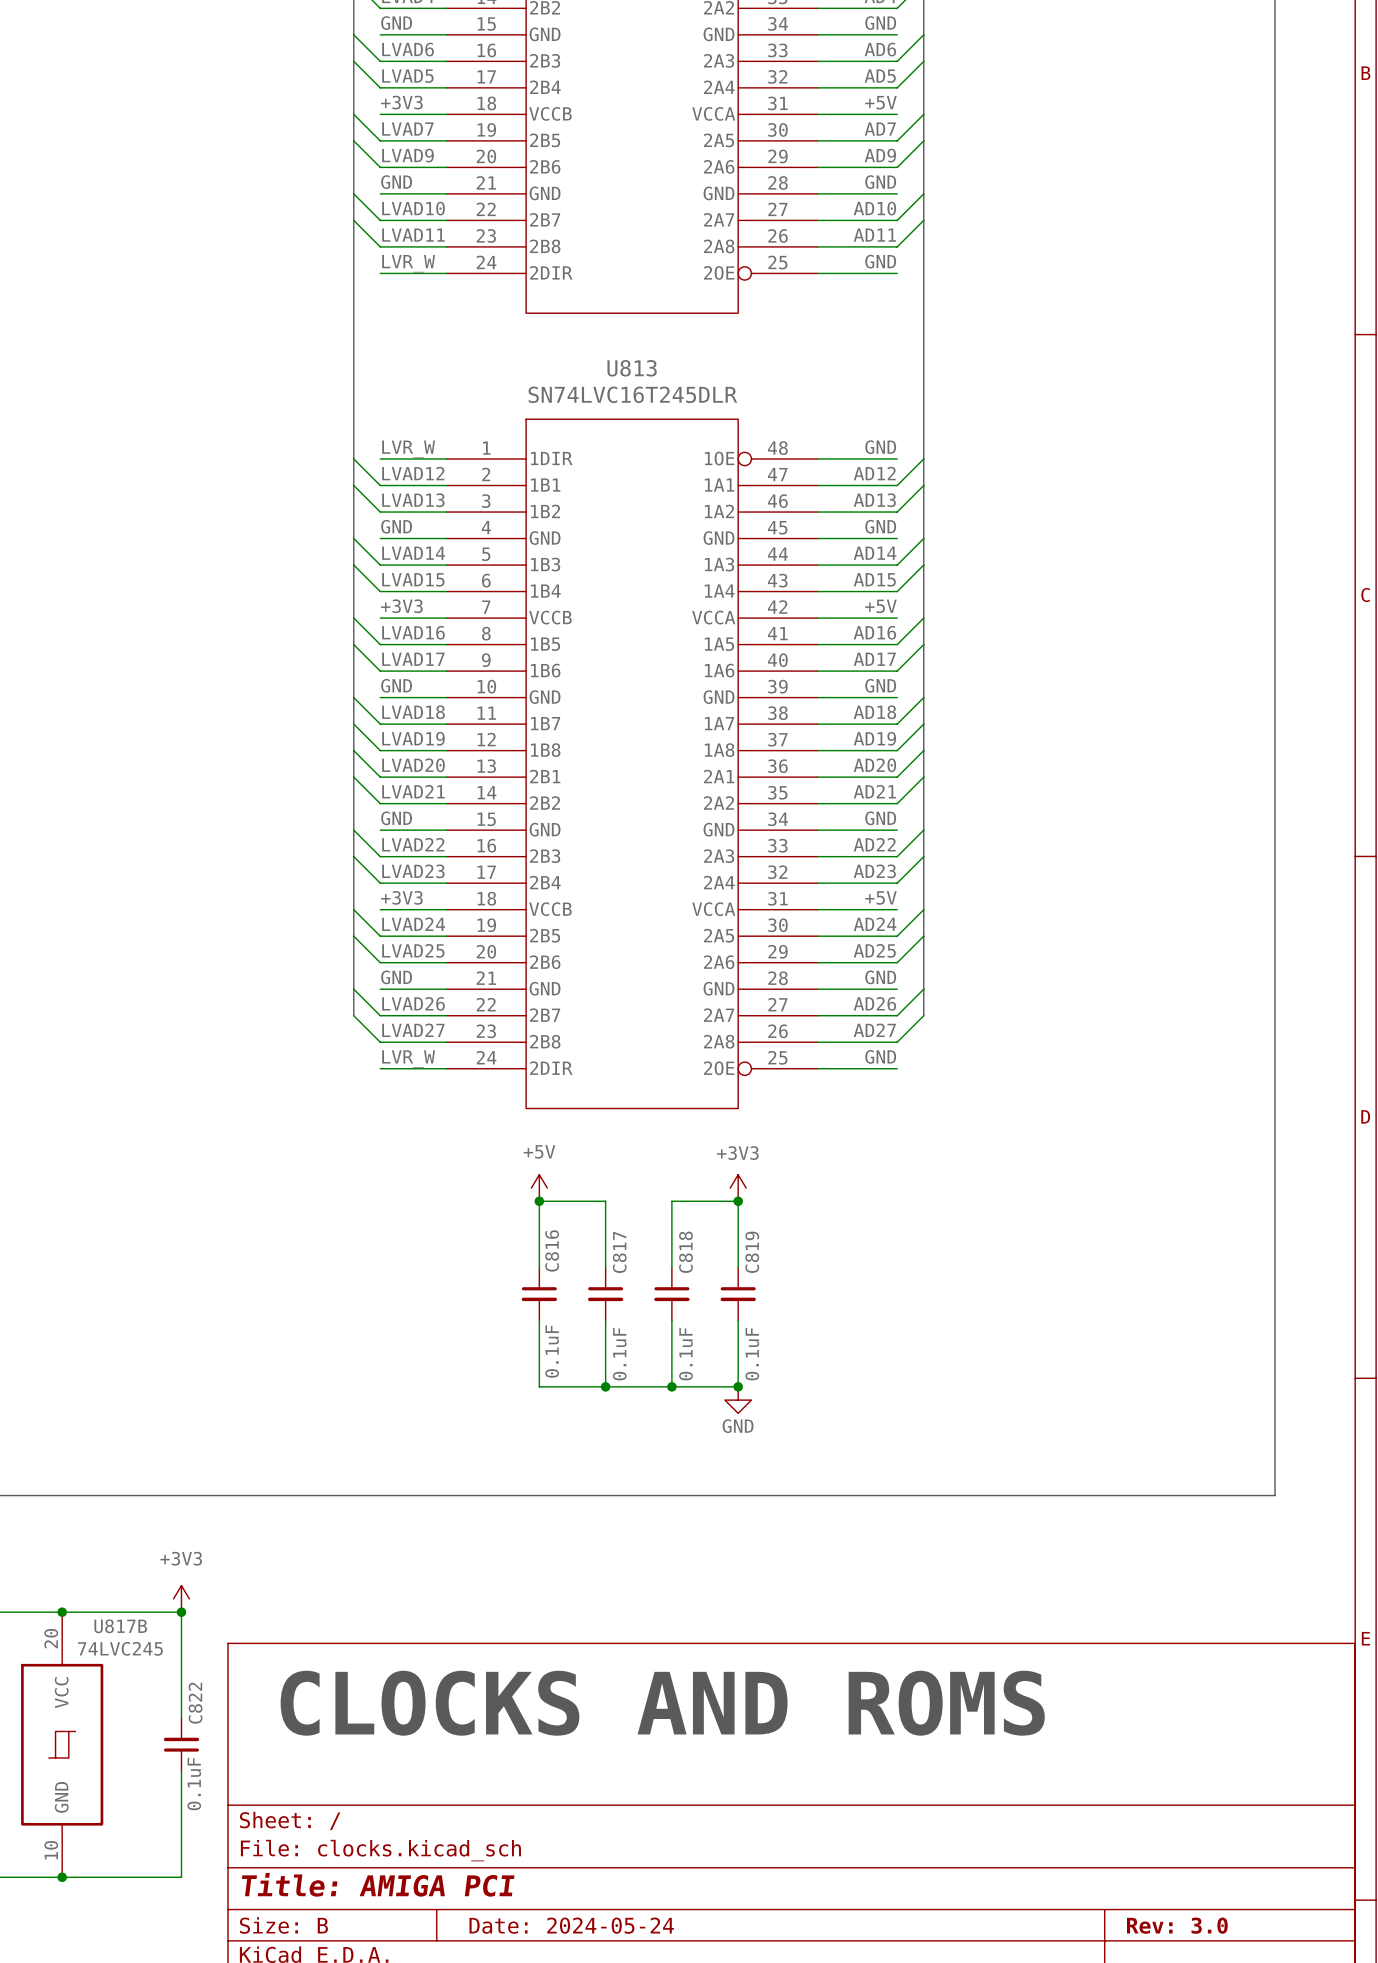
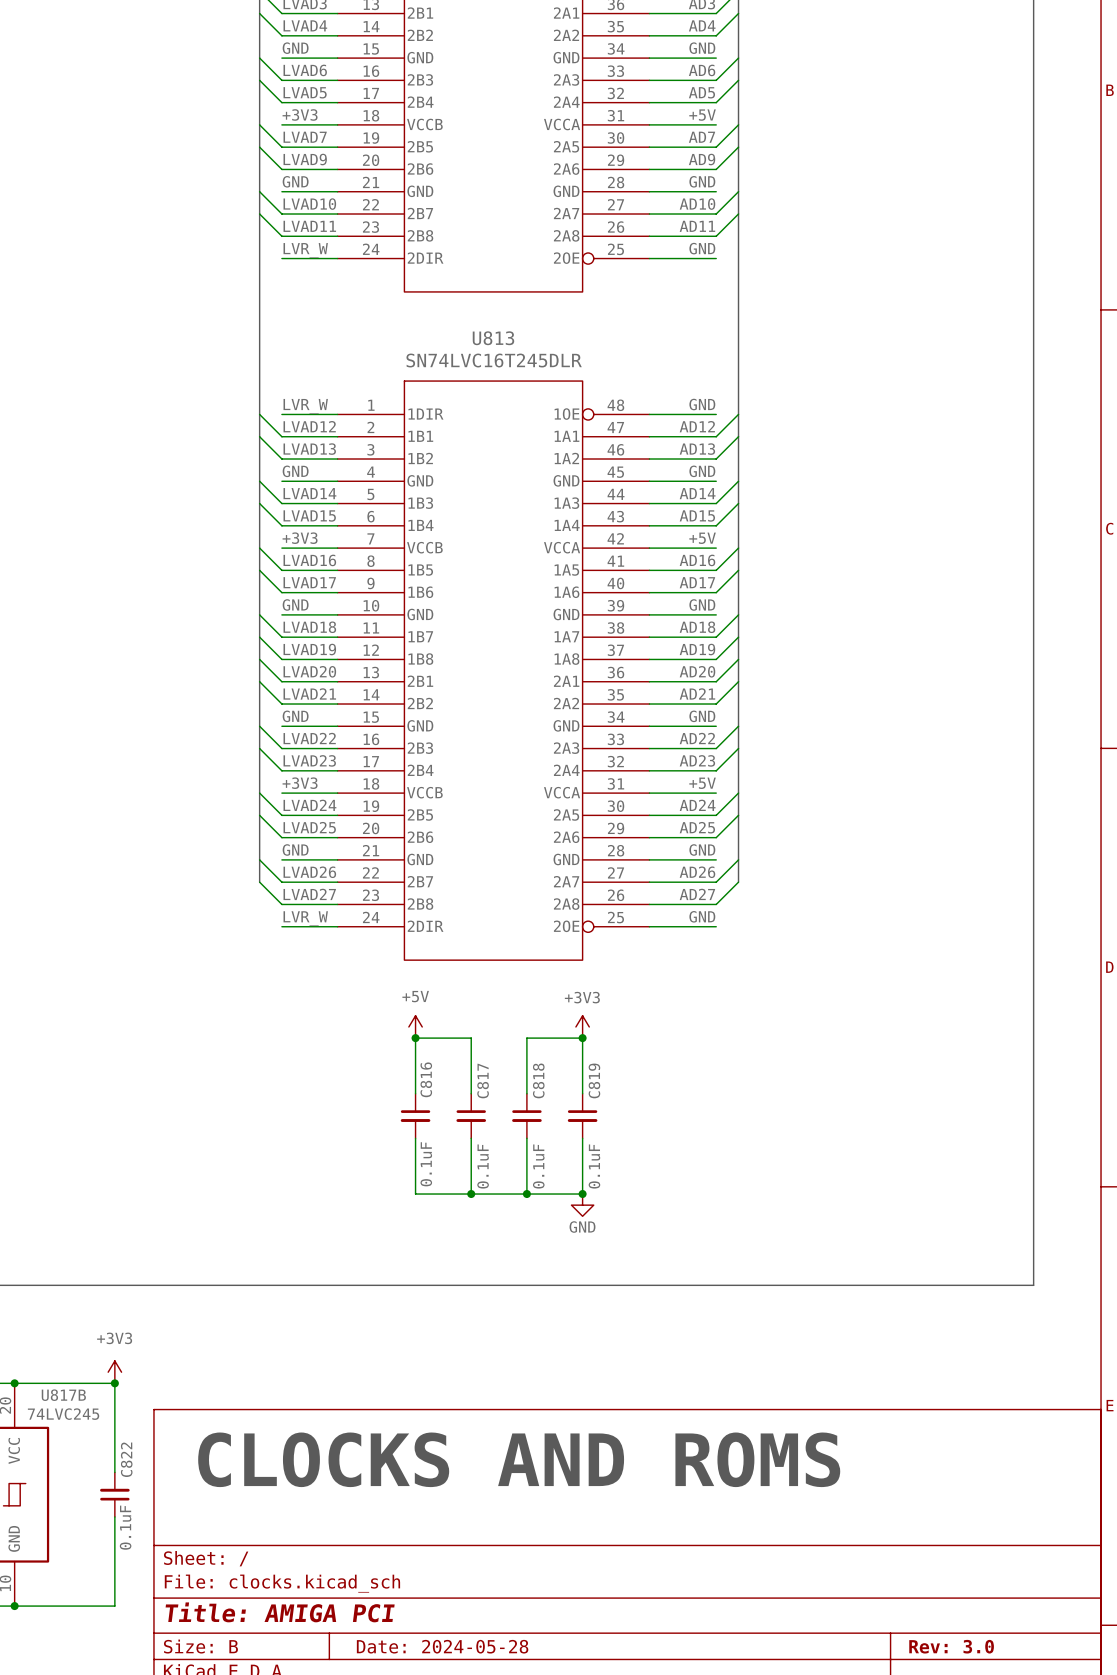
title block: Date: 2024-05-24 (571, 1925) -> Date: 2024-05-28 (442, 1646)

